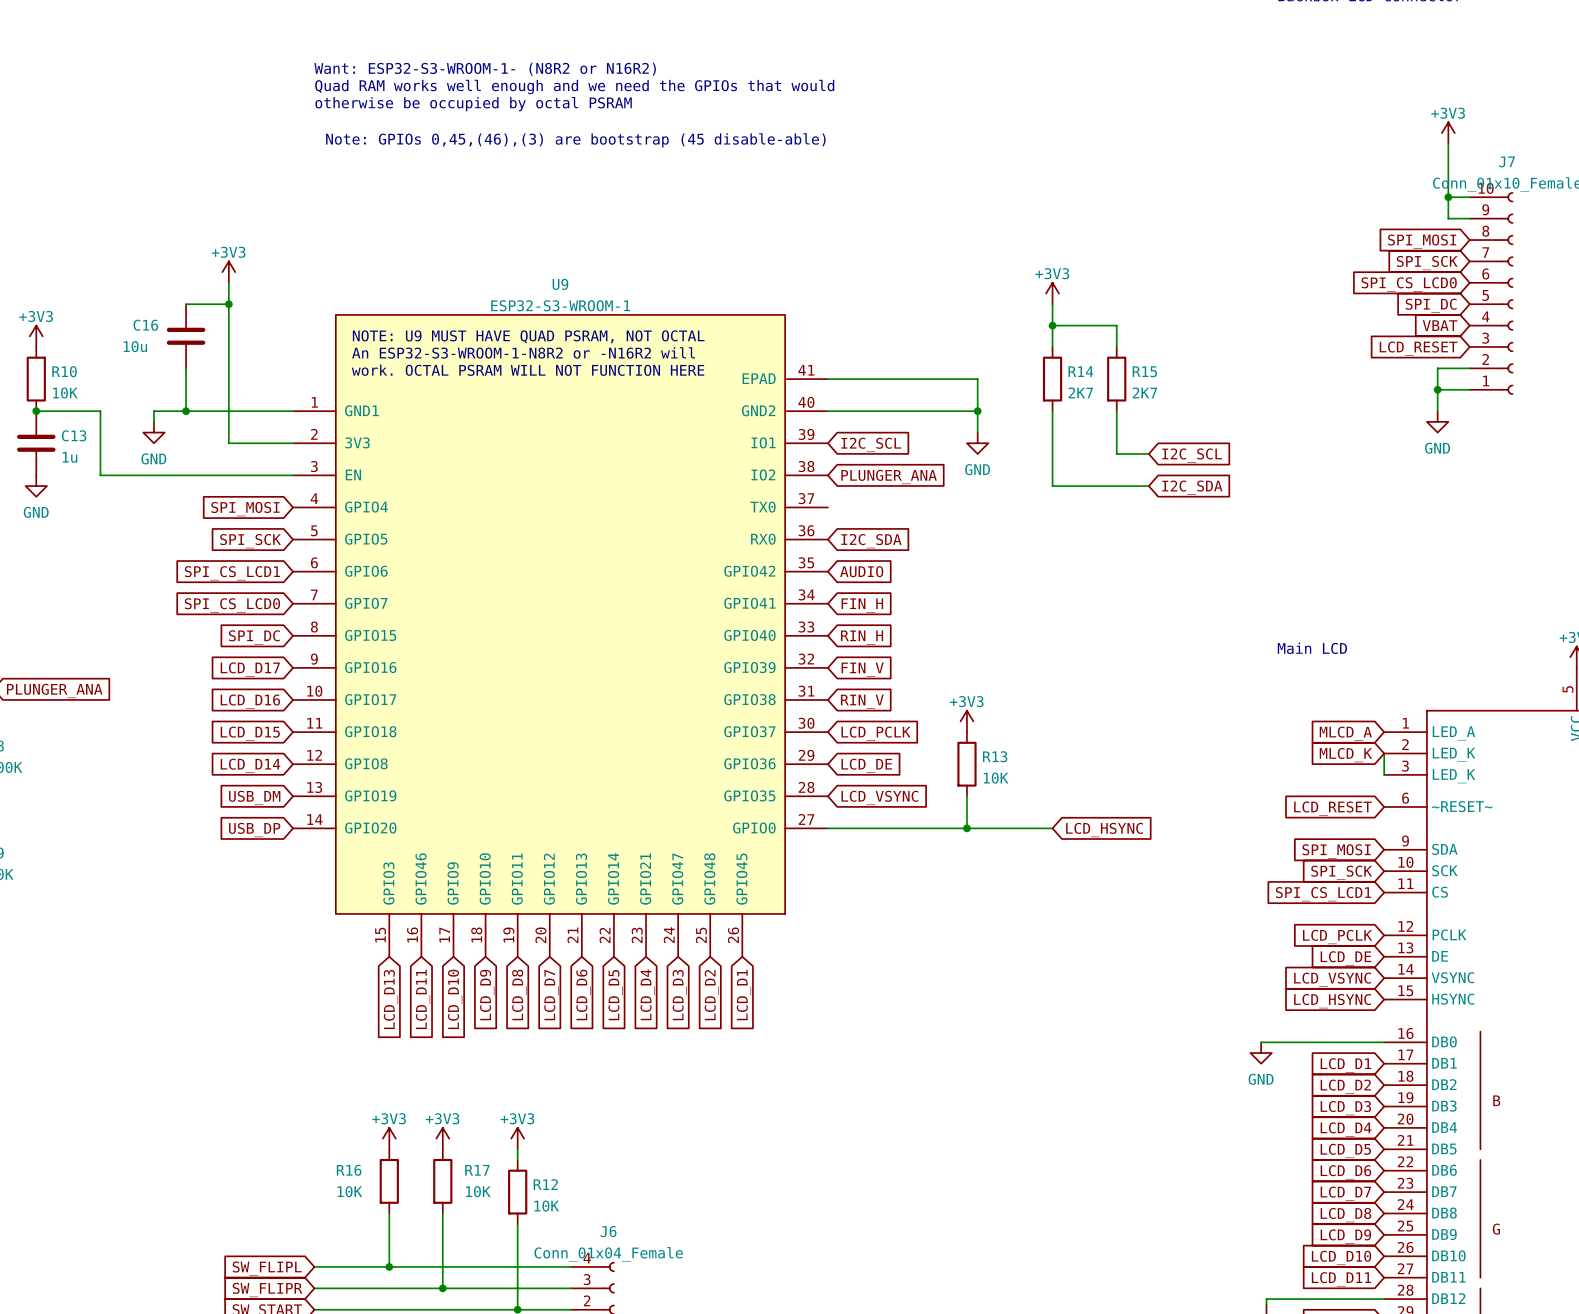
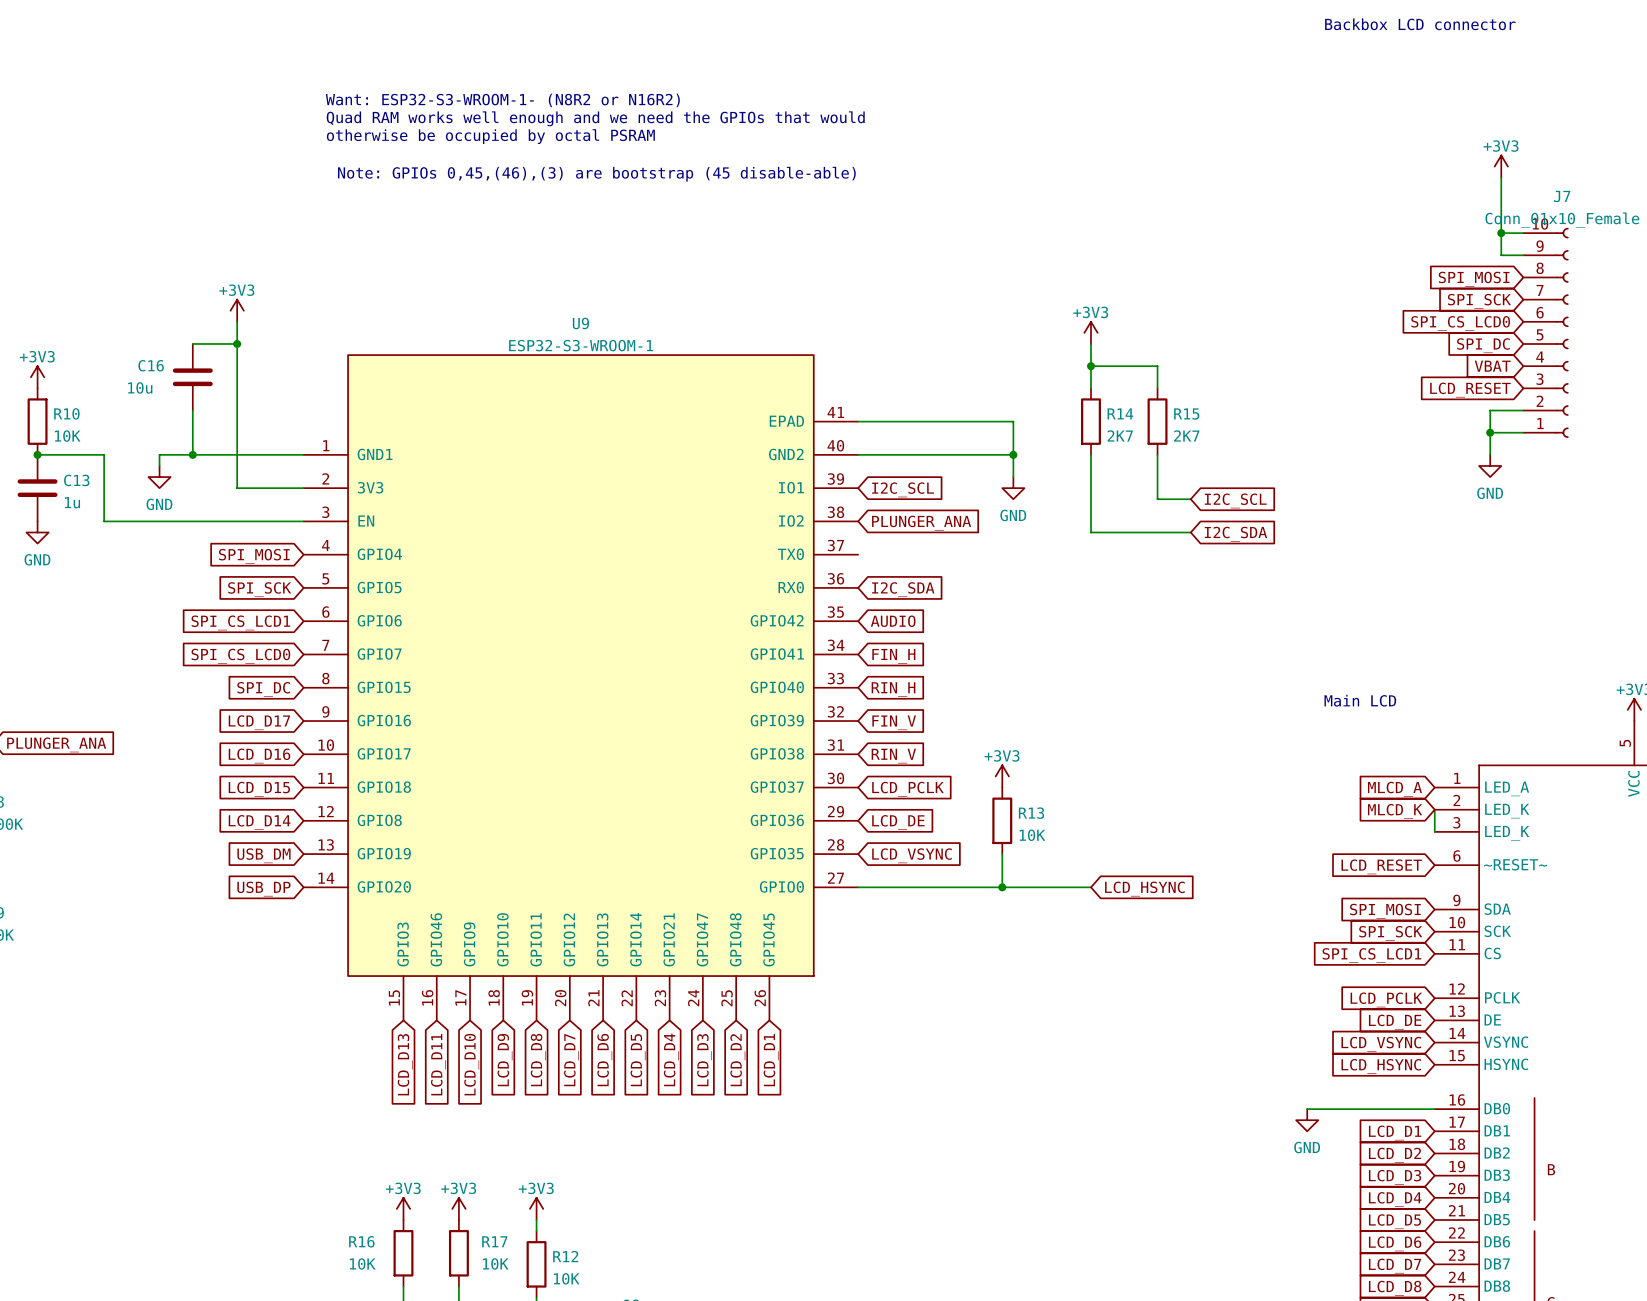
text: NOTE: U9 MUST HAVE QUAD PSRAM, NOT OCTAL (528, 336) -> none
text: An ESP32-S3-WROOM-1-N8R2 or -N16R2 will (523, 352) -> none
text: work. OCTAL PSRAM WILL NOT FUNCTION HERE (528, 370) -> none

